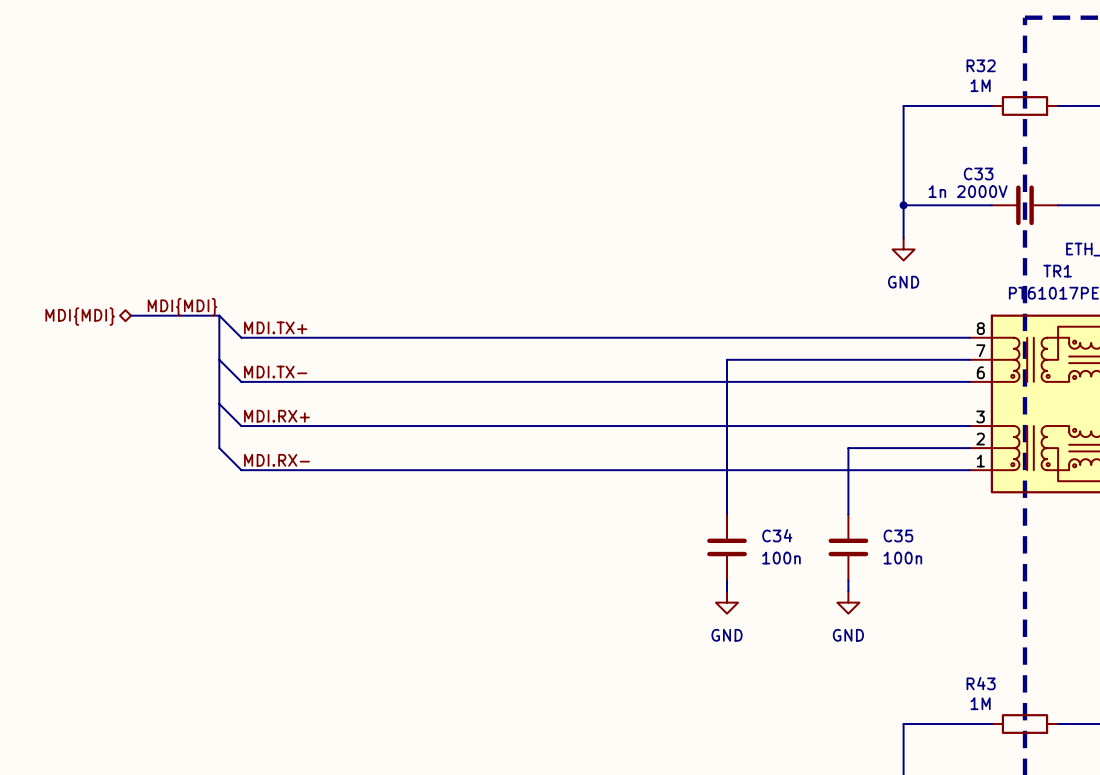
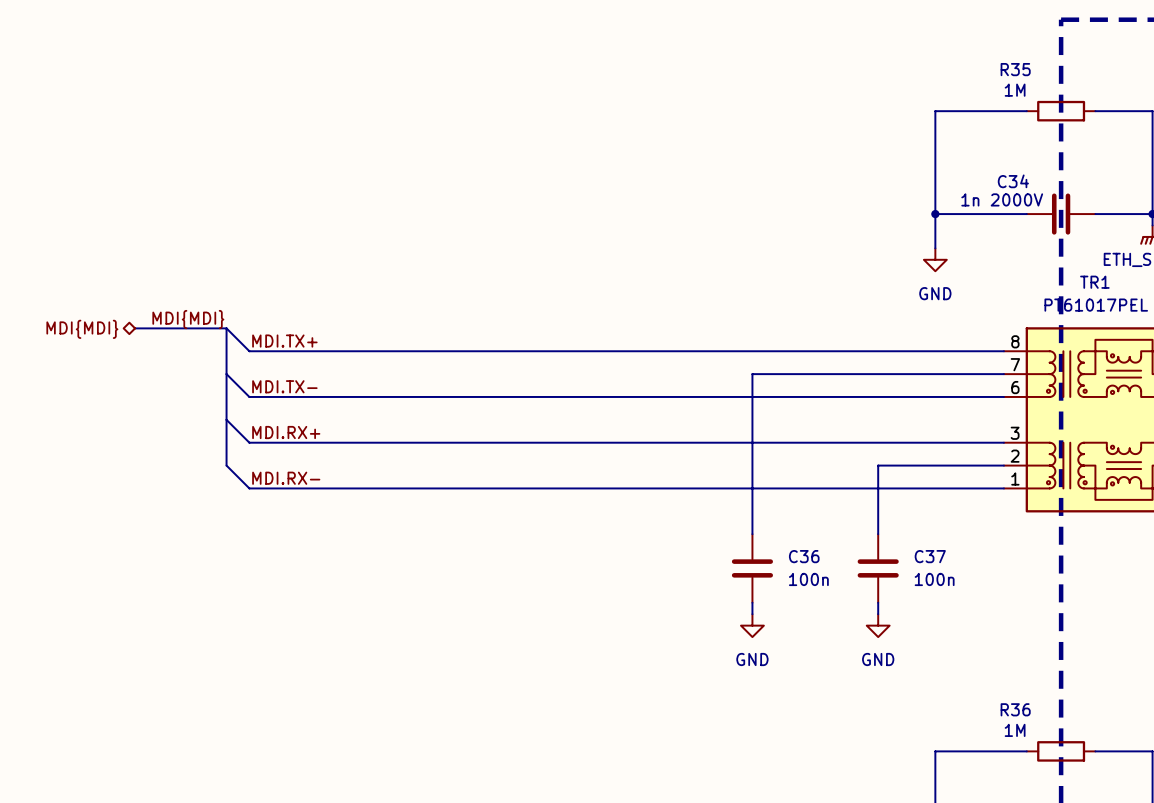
R32 name: R32 (981, 65) -> R35 (1015, 69)
C33 name: C33 (978, 173) -> C34 (1013, 181)
C34 name: C34 (777, 535) -> C36 (804, 556)
C35 name: C35 (898, 535) -> C37 (930, 556)
R43 name: R43 (981, 683) -> R36 (1015, 709)

